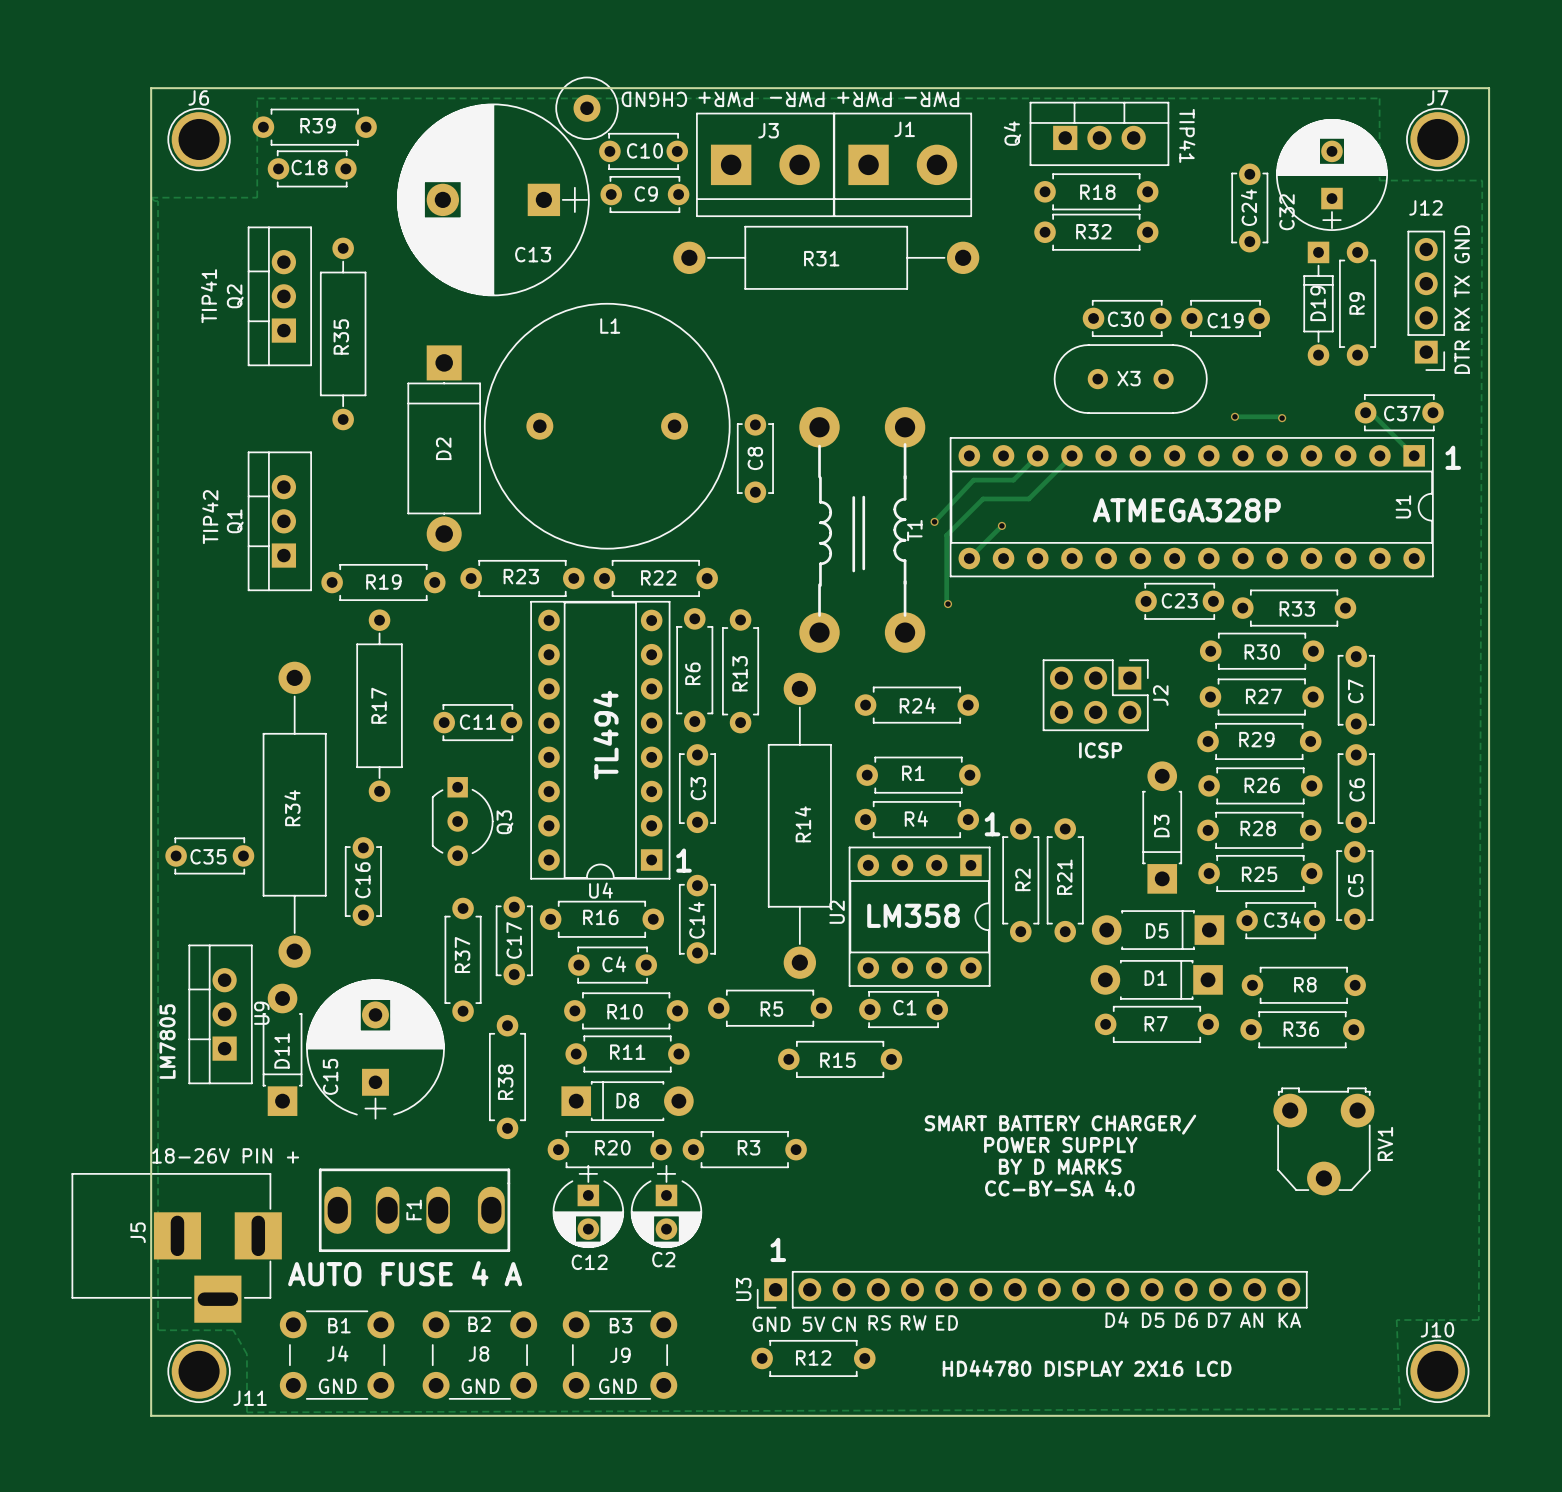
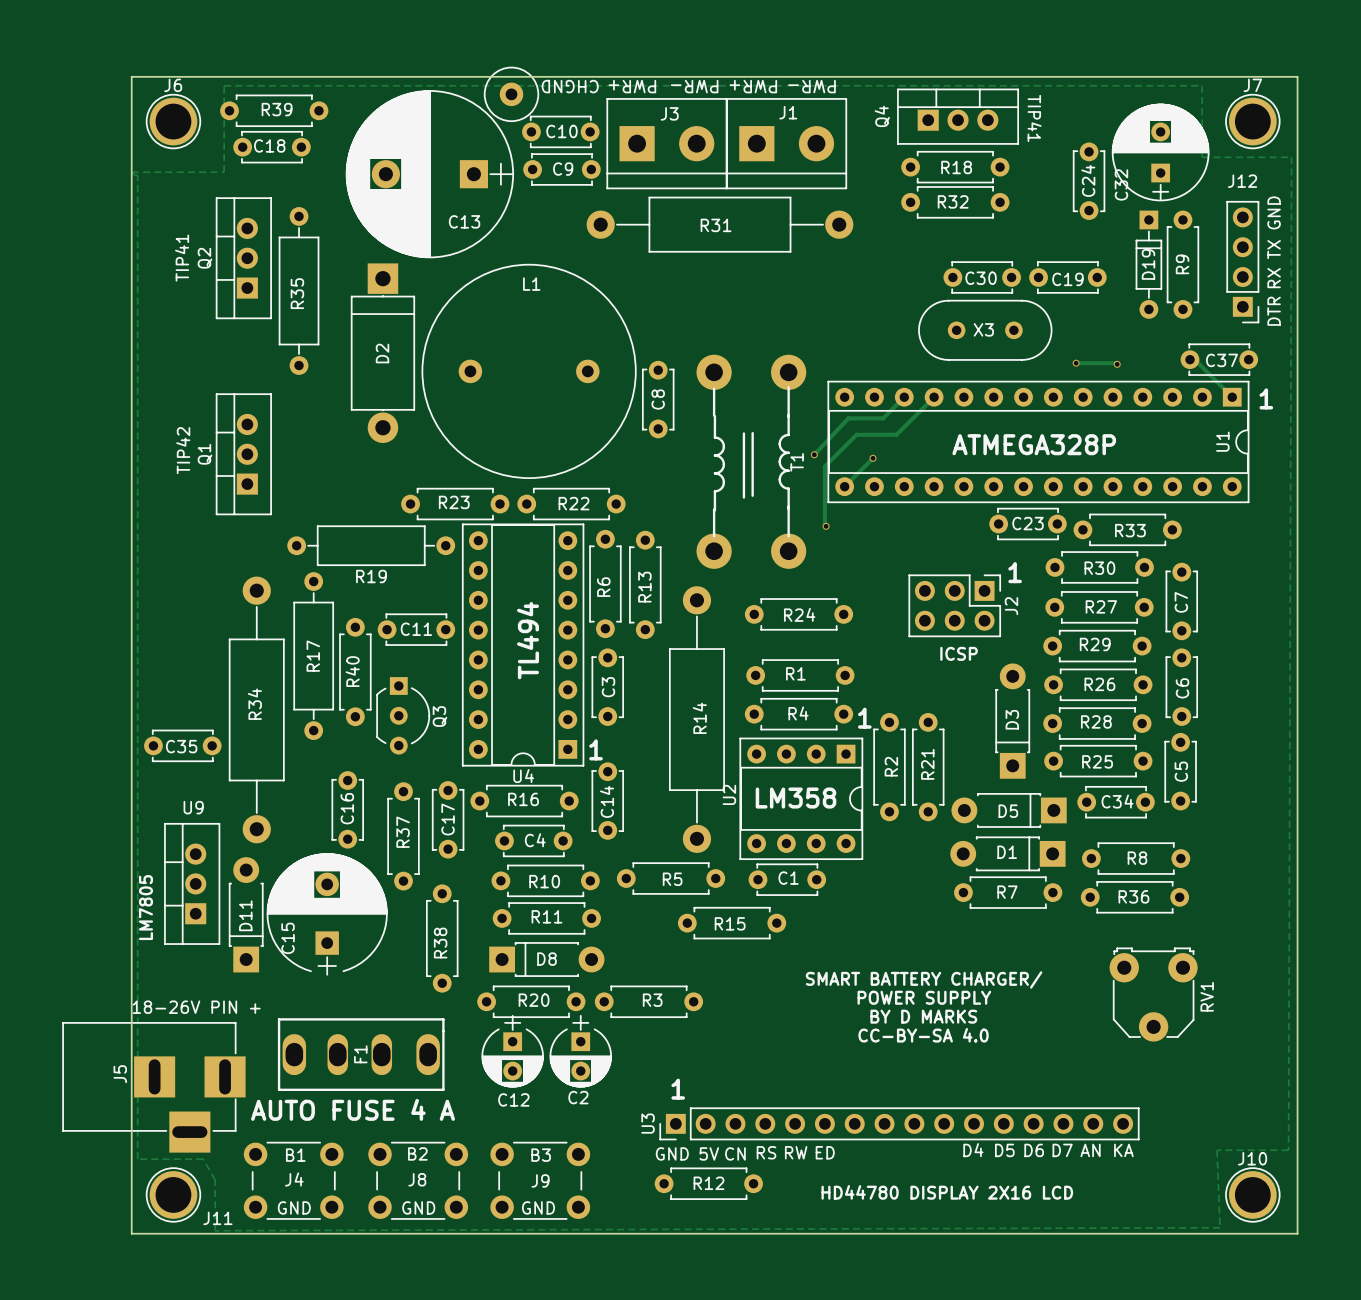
D2 position: (444, 448) -> (382, 353)
R19 footprint: [321, 564, 446, 601] -> [287, 525, 456, 566]
R19 name position: R19 (383, 581) -> R19 (371, 576)
text: none -> 1 (1015, 572)
R17 position: (379, 705) -> (313, 656)
R40: none -> (355, 672)
C16 position: (363, 881) -> (347, 809)
U9 name rotation: 0° (261, 1013) -> 90° clockwise (193, 807)
U9 name position: U9 (261, 1013) -> U9 (193, 807)

